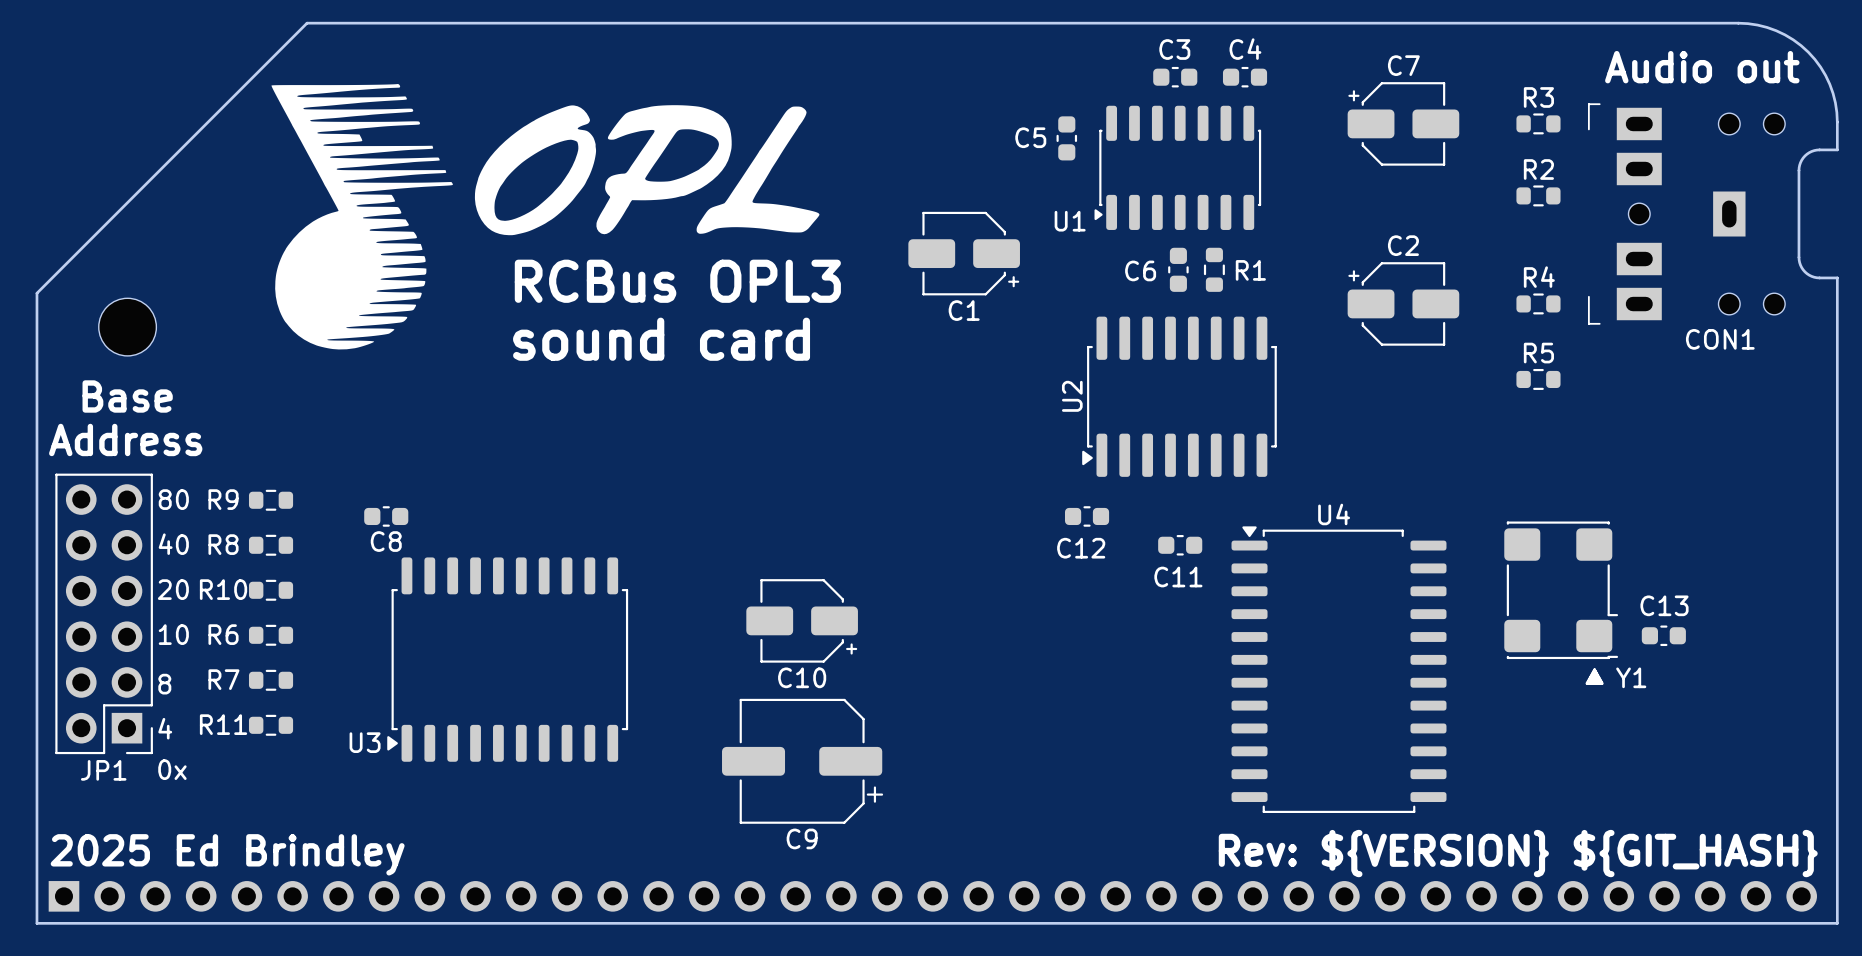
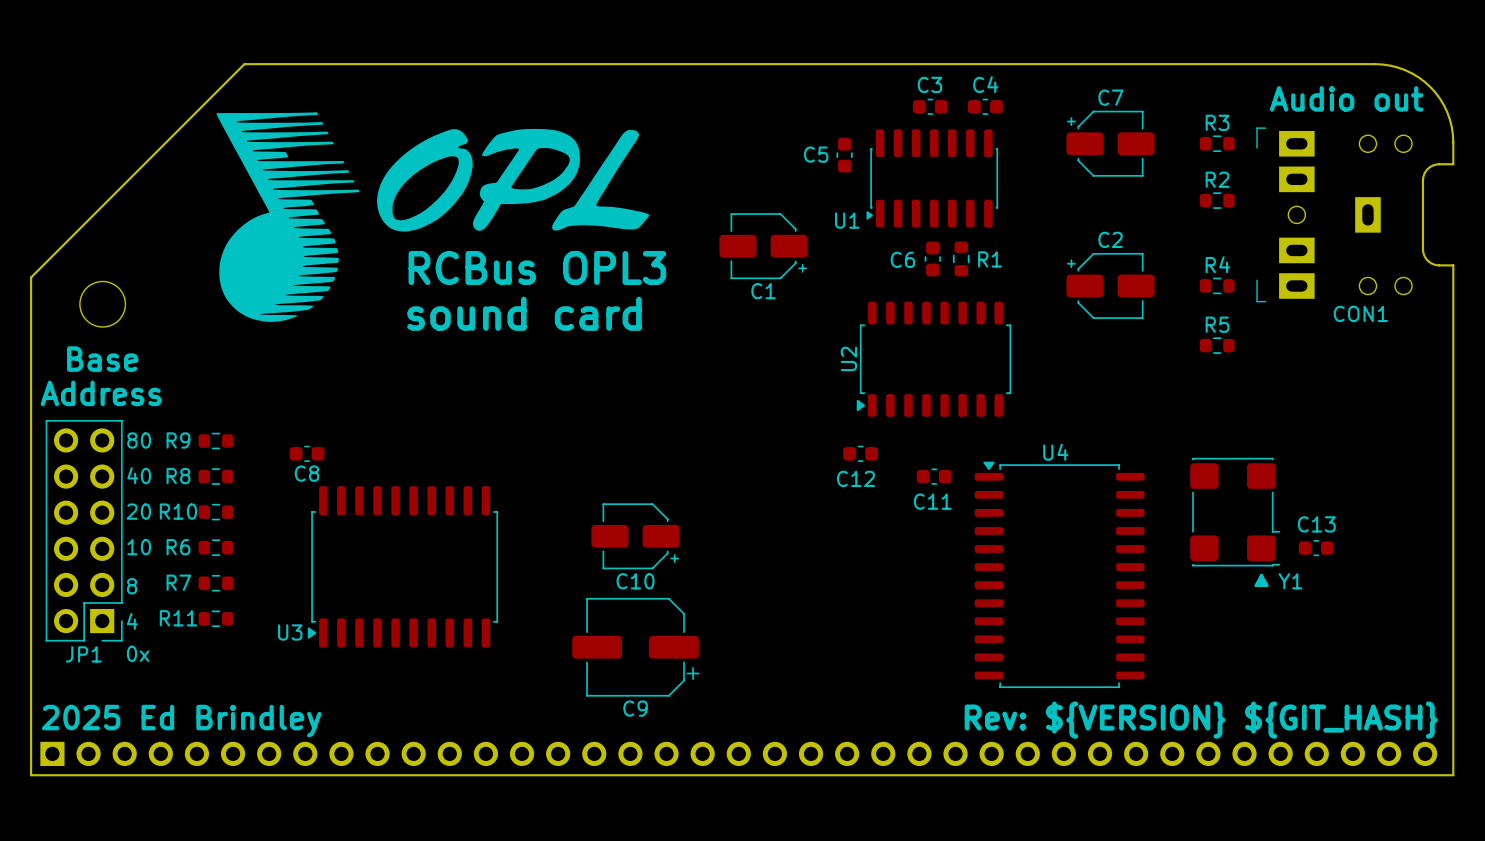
U2 footprint: [1082, 316, 1277, 477] -> [856, 301, 1012, 417]
U4 footprint: [1231, 526, 1447, 813] -> [974, 461, 1145, 689]

